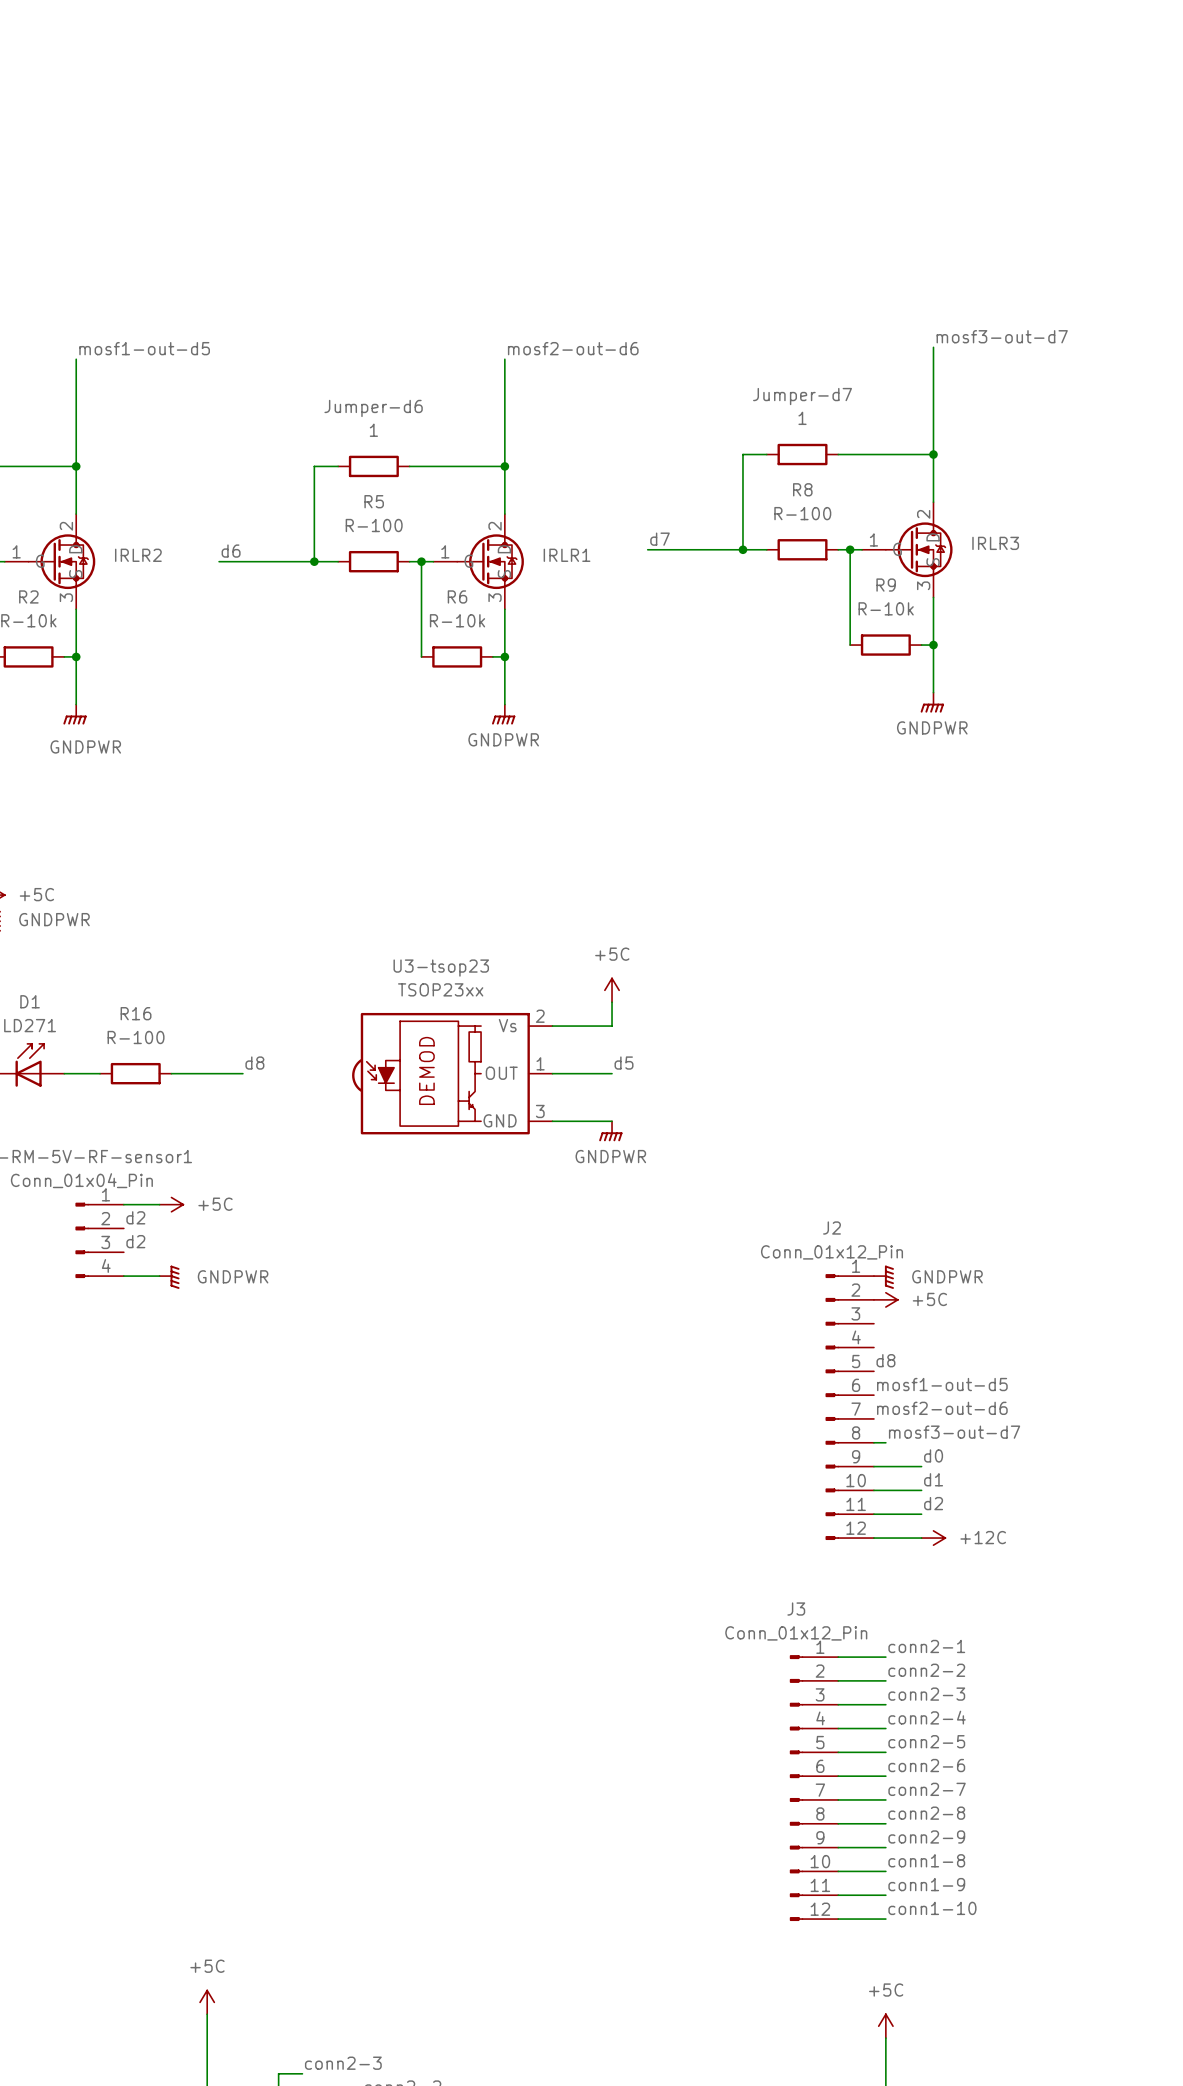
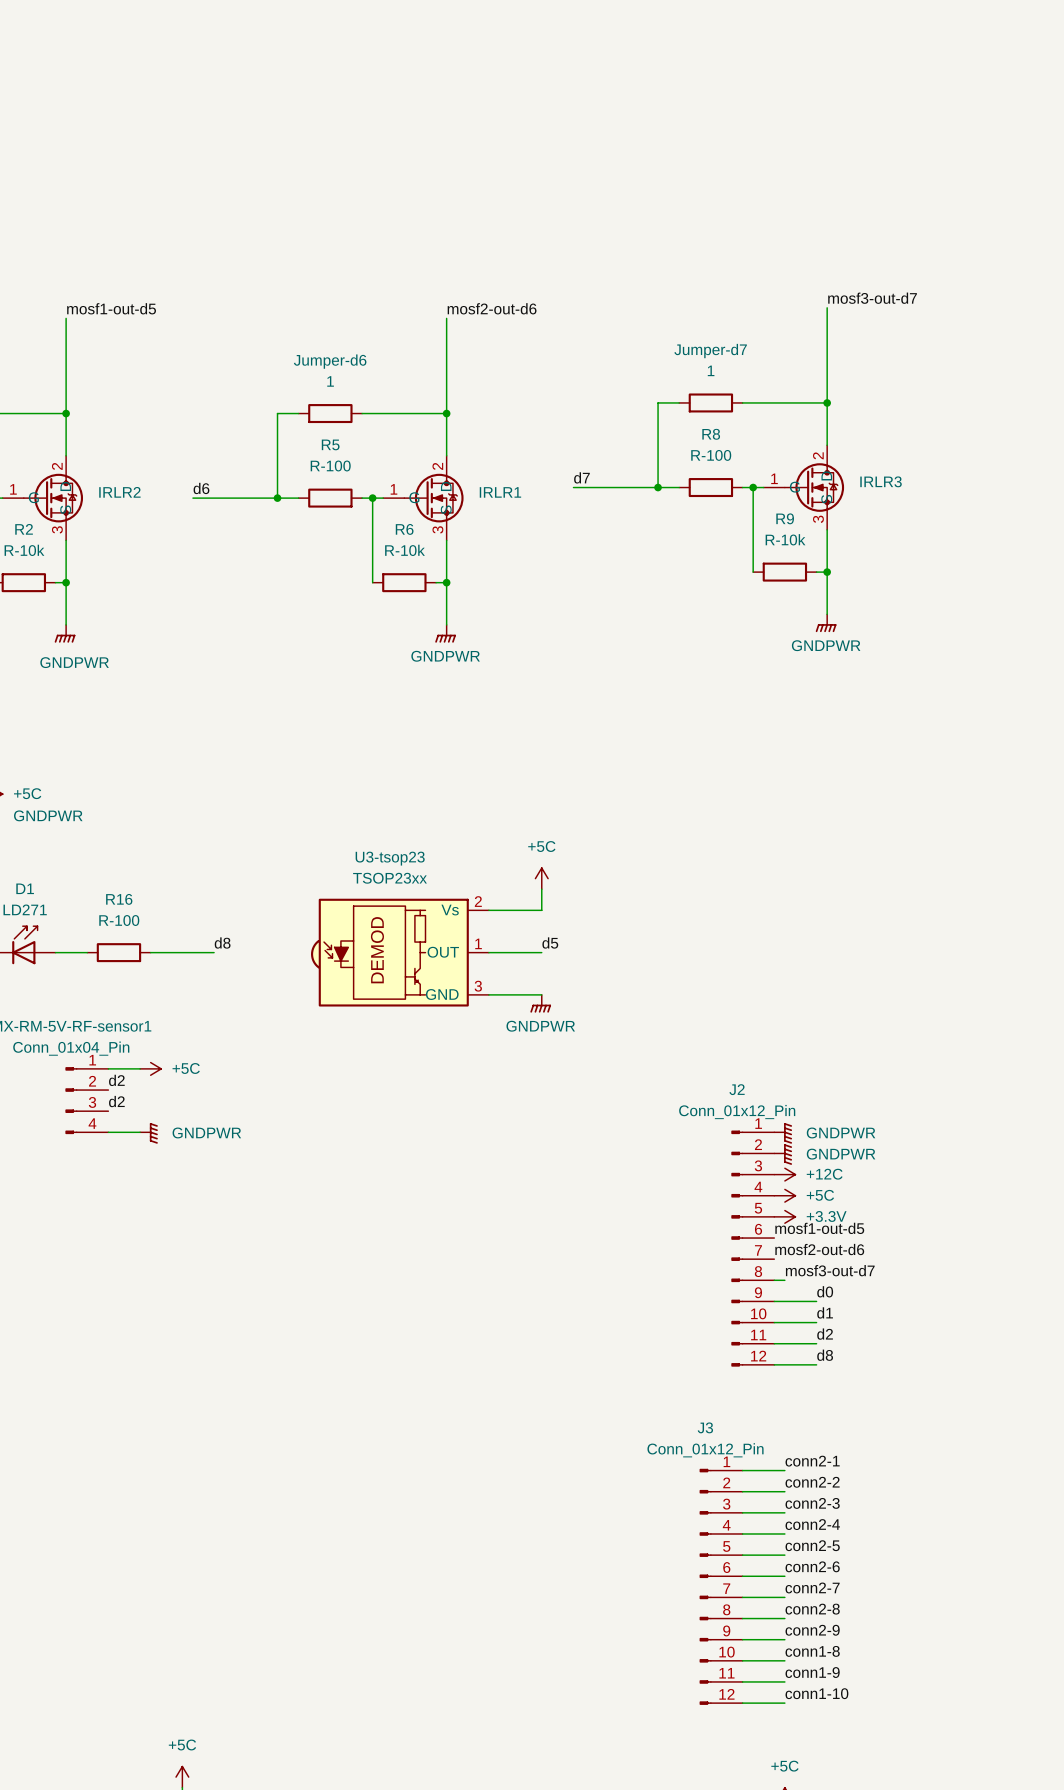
power symbol: +5C (885, 1299) -> GNDPWR (783, 1154)
power symbol: none -> +5C (784, 1195)
label position: d8 (885, 1360) -> d8 (825, 1355)
power symbol: none -> +3.3V (784, 1216)
power symbol position: +12C (933, 1538) -> +12C (784, 1174)

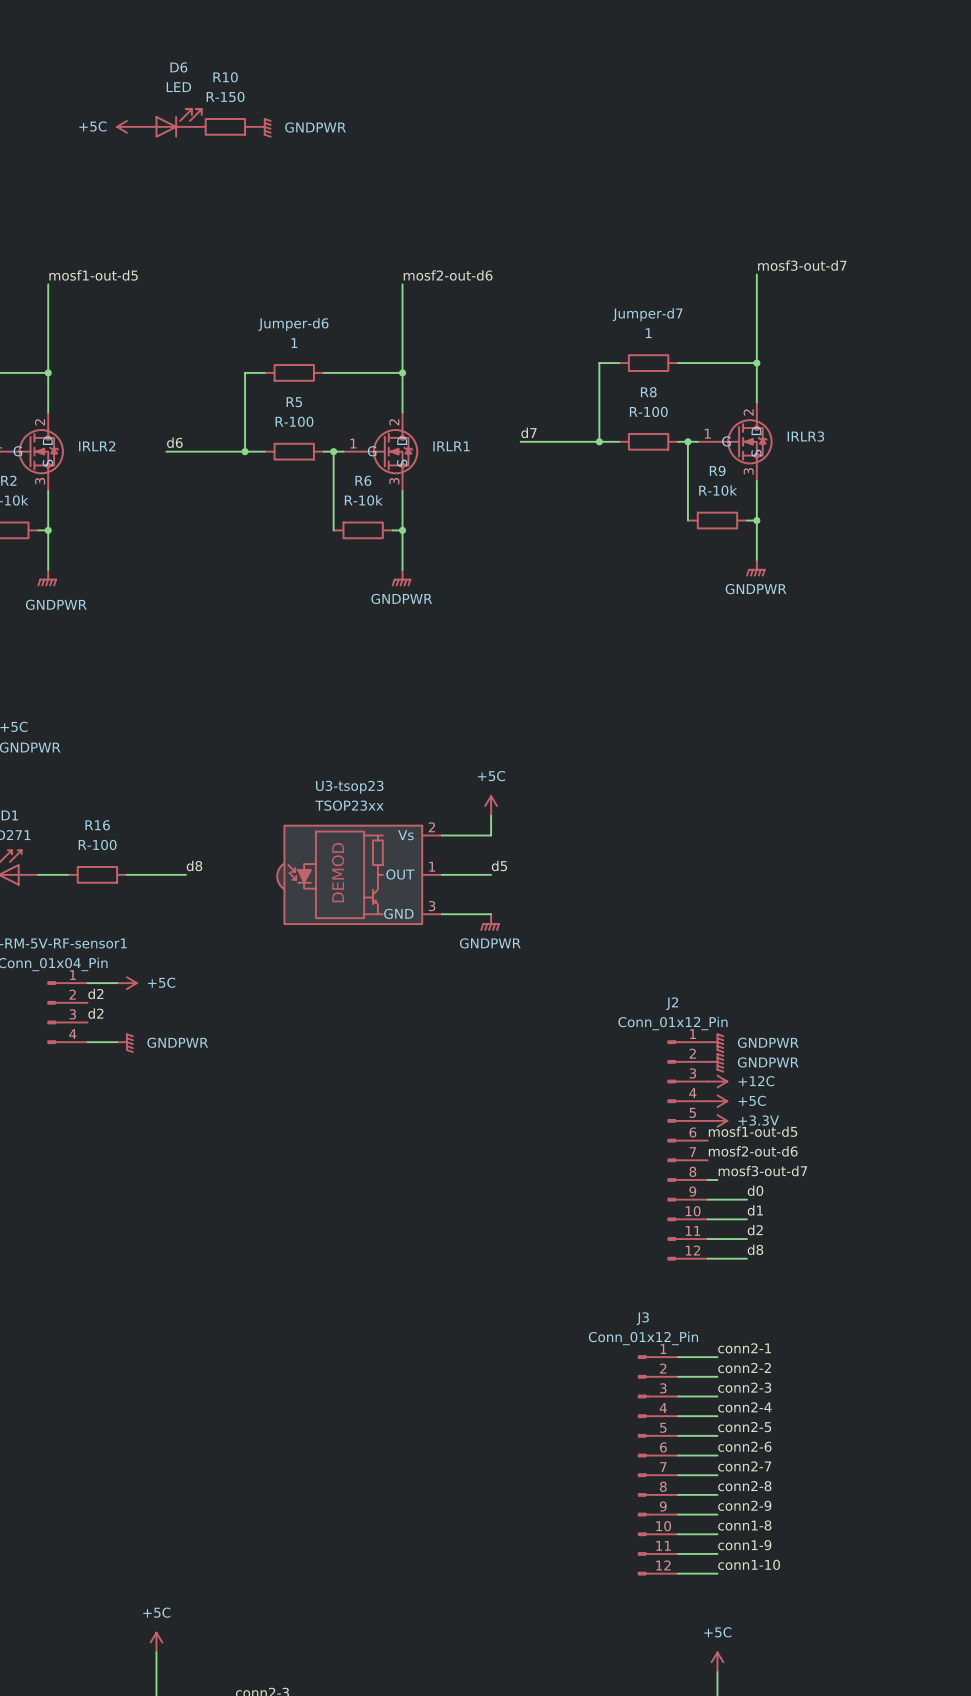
D6: none -> LED (169, 123)
power symbol: none -> +5C (126, 126)
R10: none -> R-150 (225, 126)
power symbol: none -> GNDPWR (263, 127)

